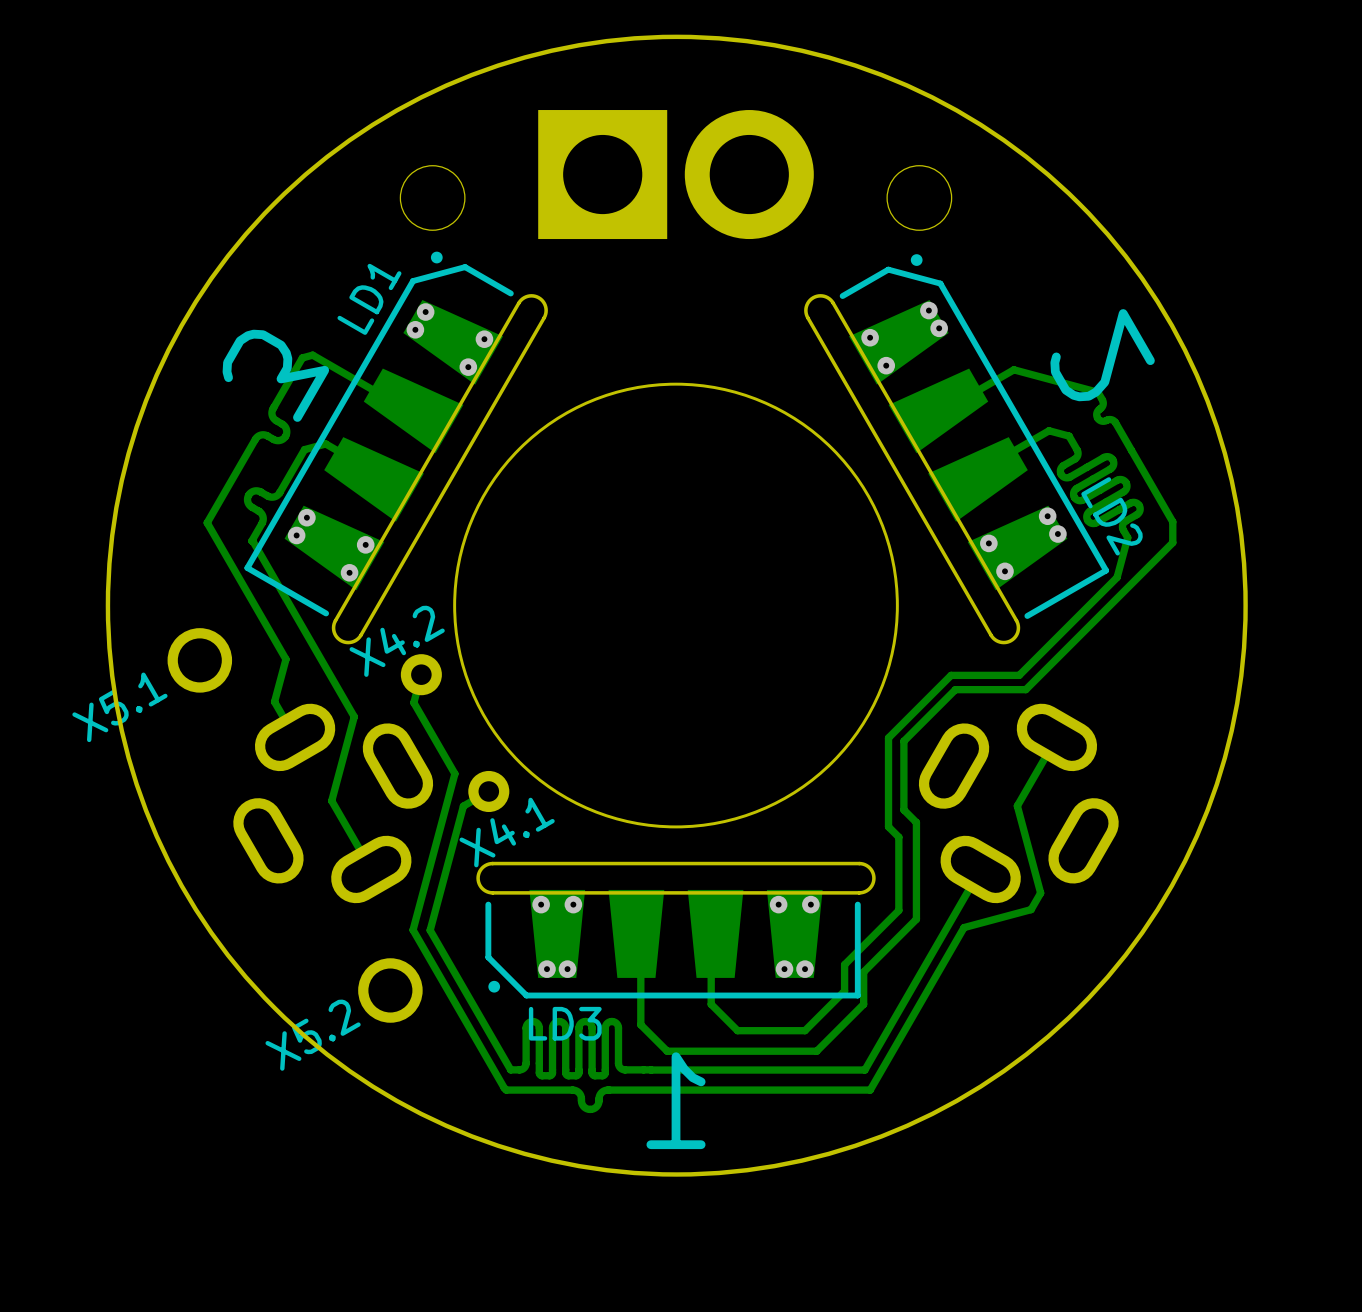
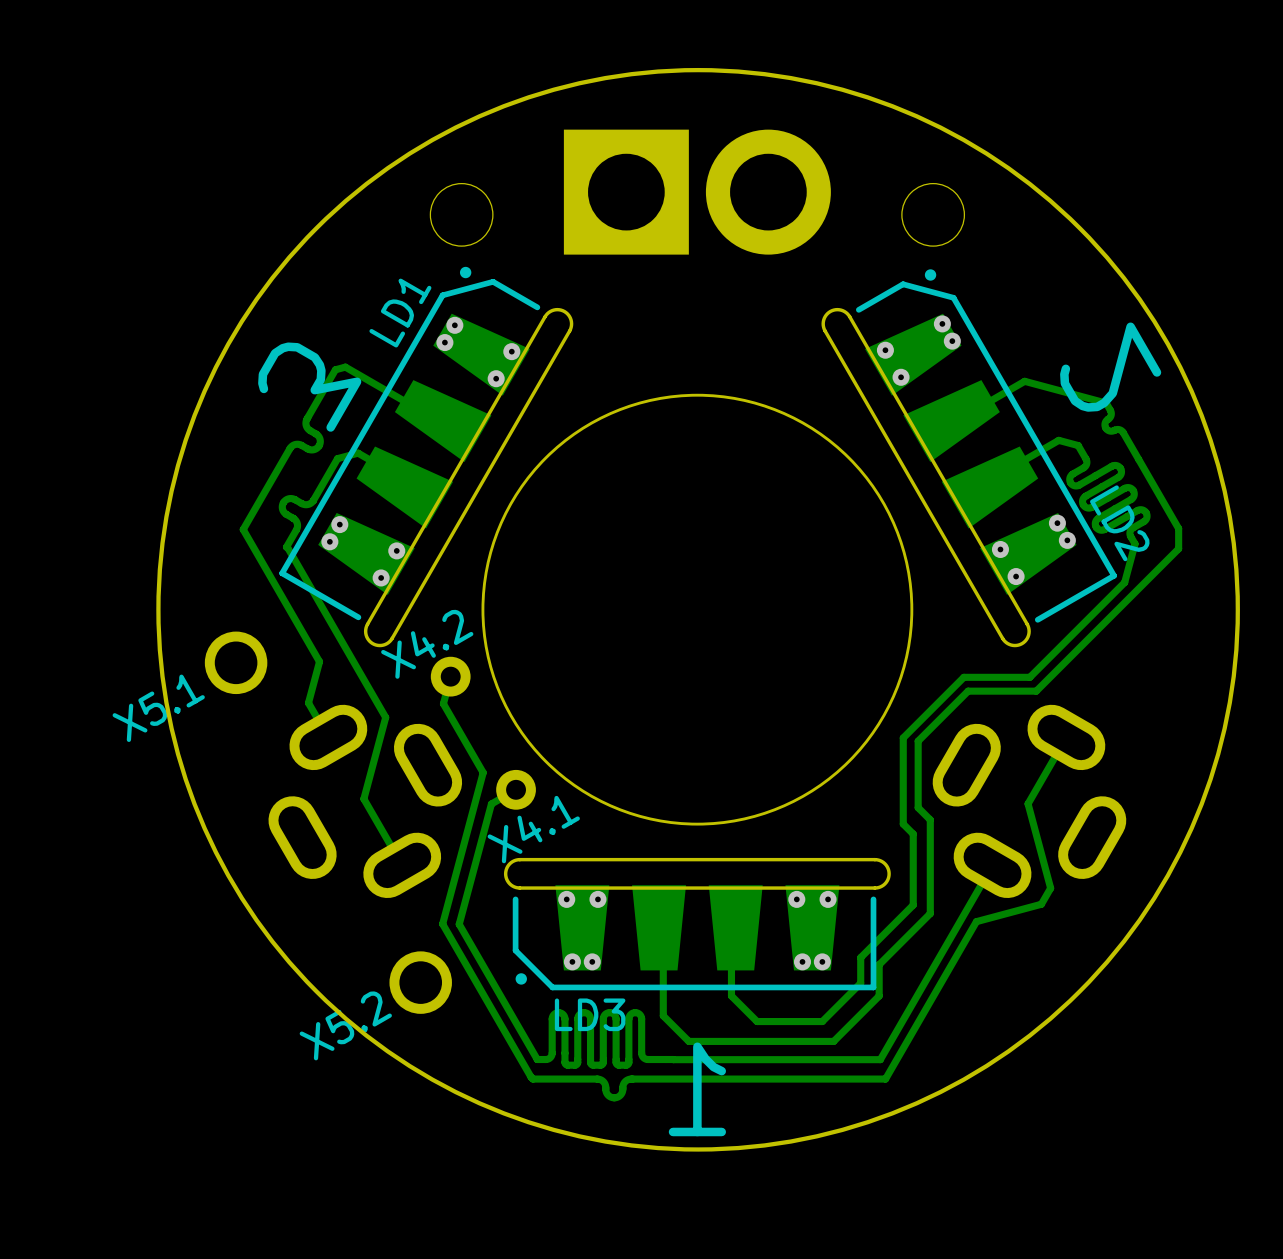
round board edge size: [105, 34, 1248, 1177] -> [156, 67, 1240, 1152]

